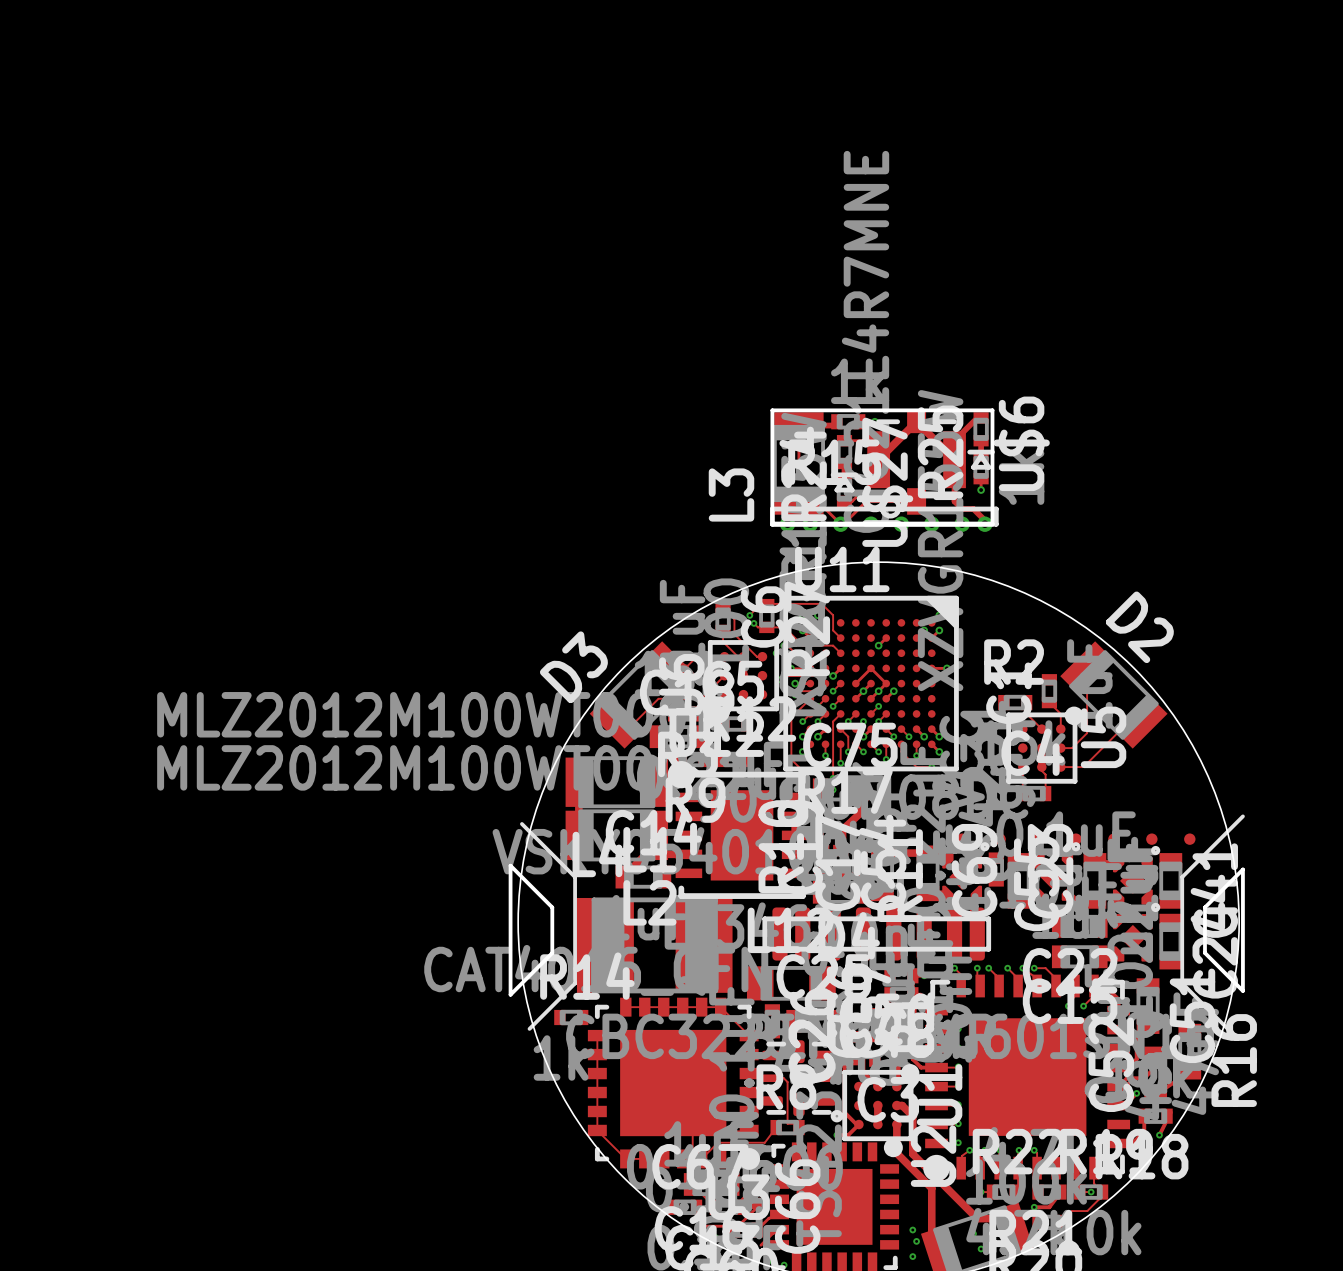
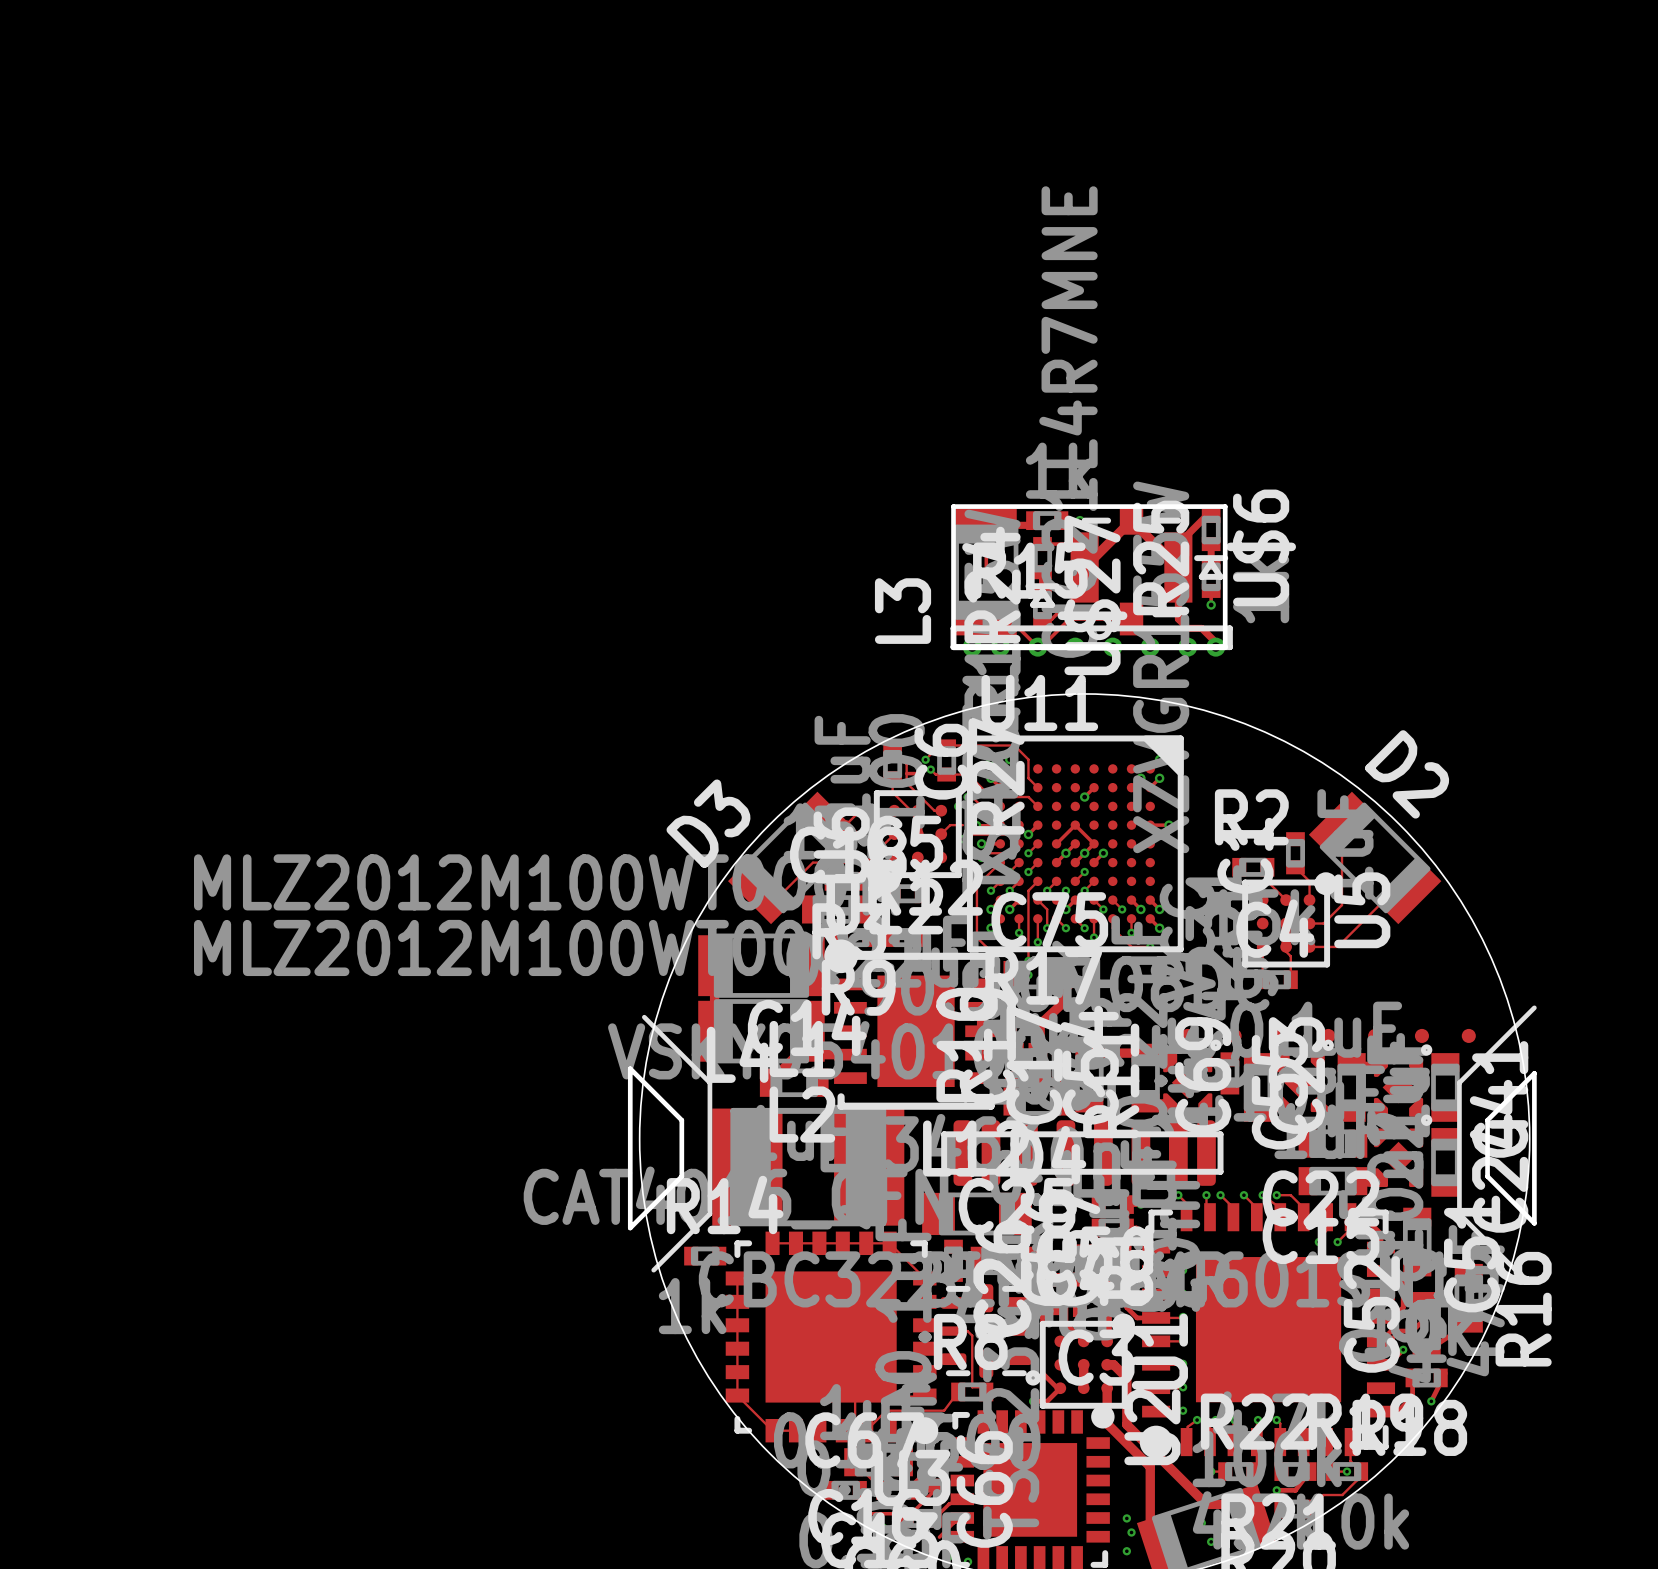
track: none -> (906, 773) (916, 773)
track: none -> (962, 825) (950, 825) (941, 834)

